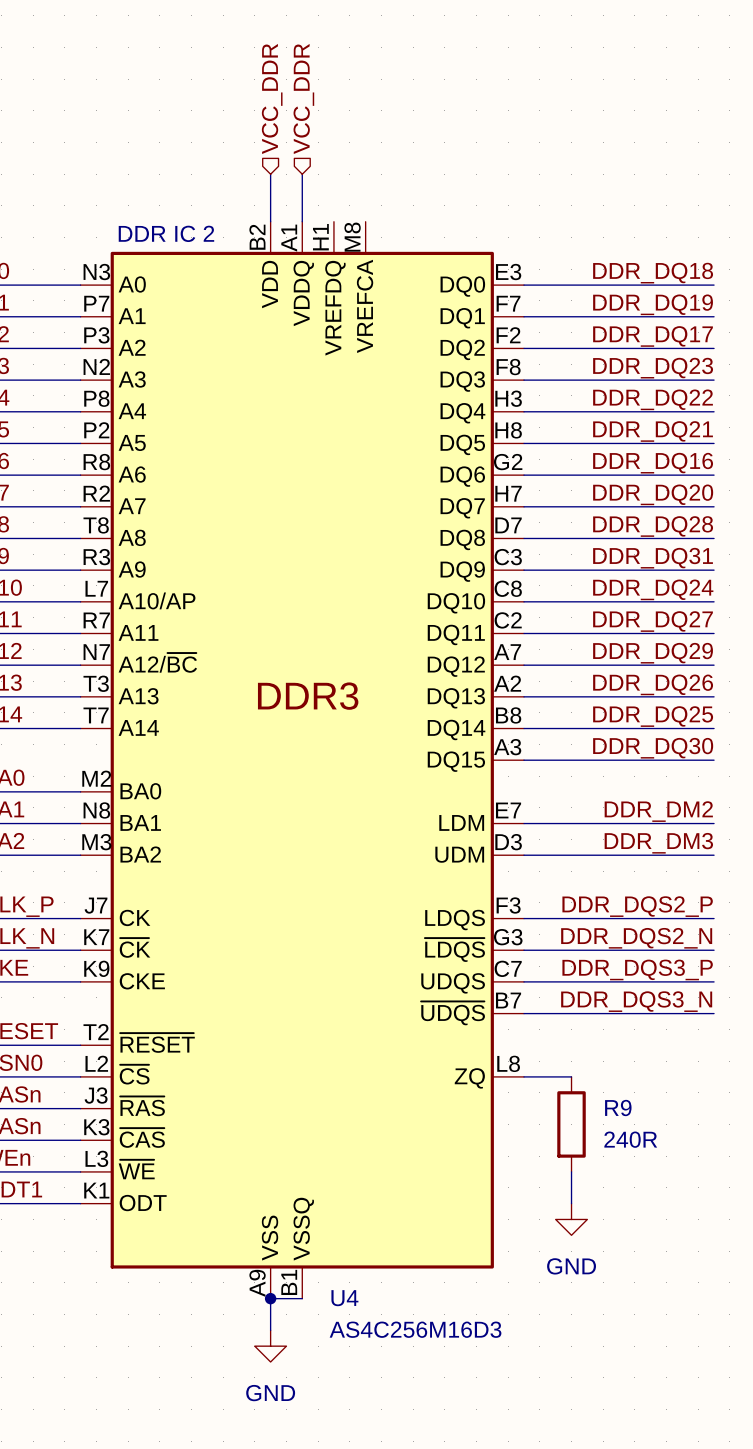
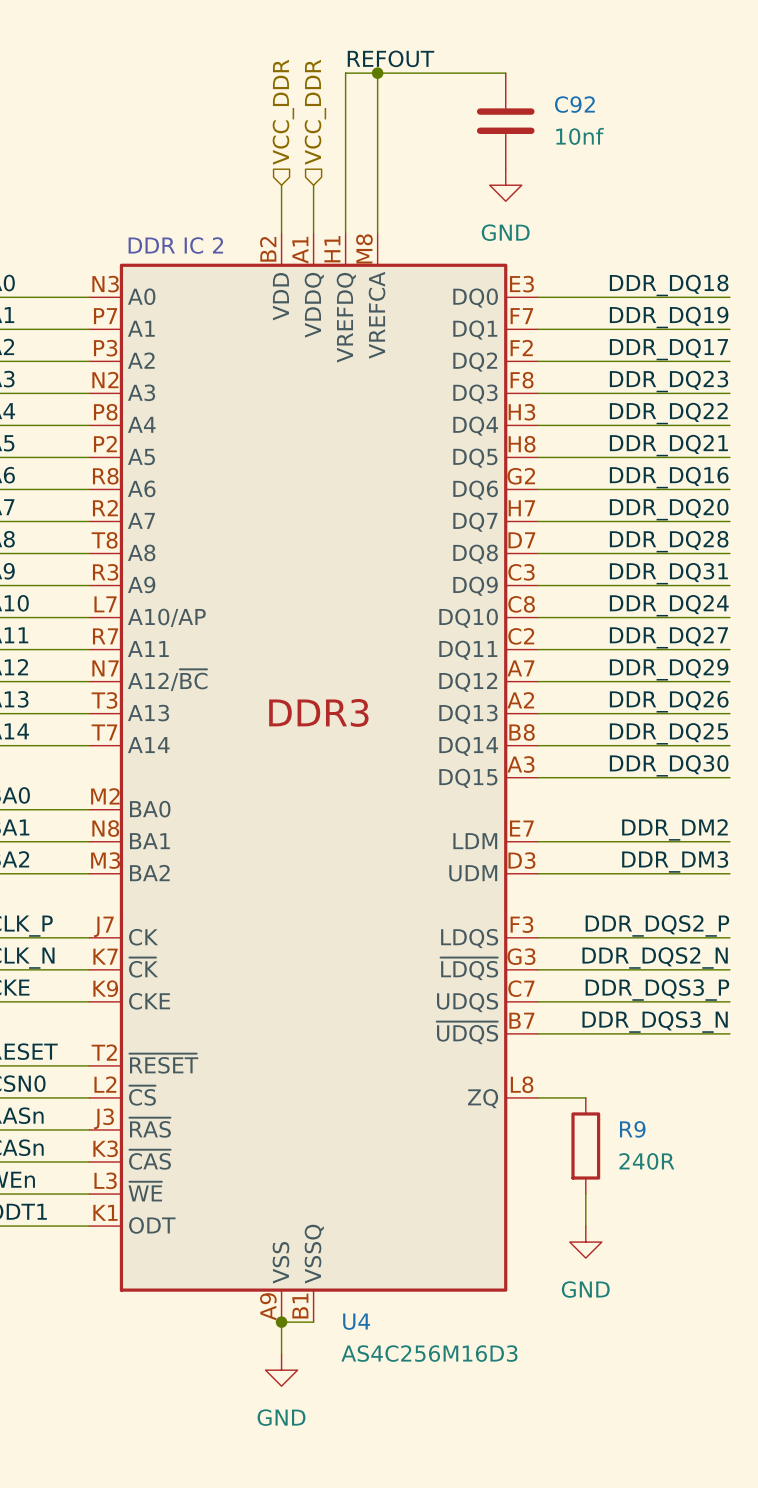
label: none -> REFOUT (390, 58)
wire: none -> (377, 73) (377, 233)
junction: none -> (377, 73)
wire: none -> (505, 73) (345, 73) (345, 233)
C92: none -> 10nf (505, 121)
power symbol: none -> GND (505, 185)

